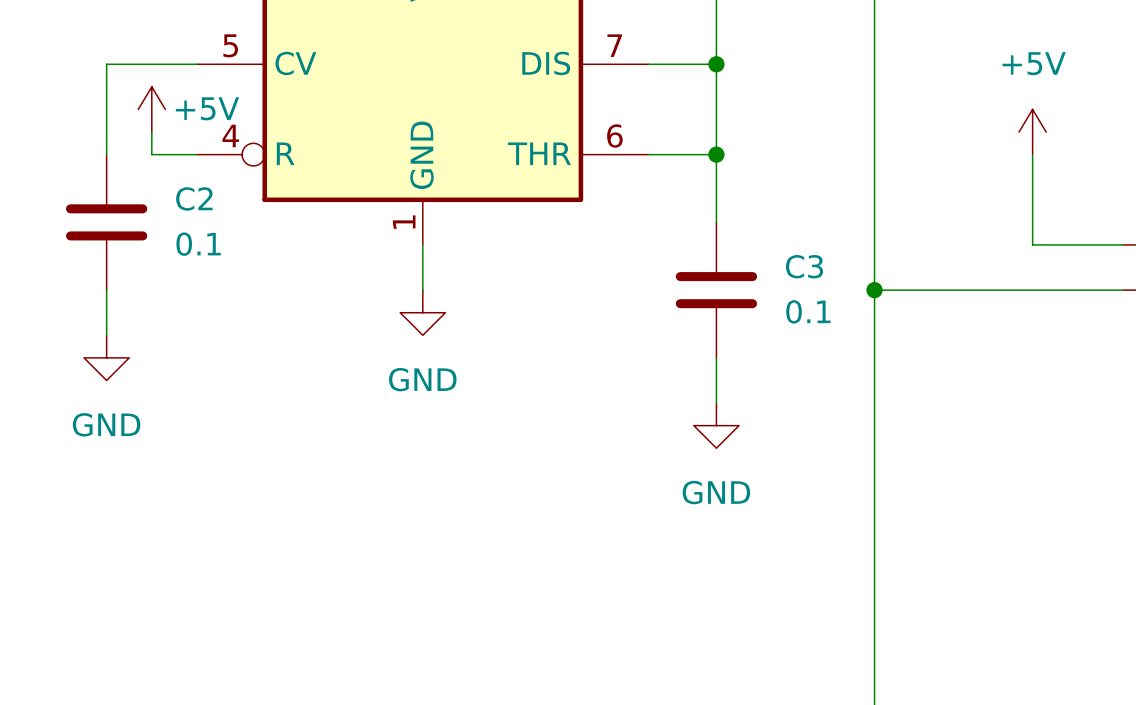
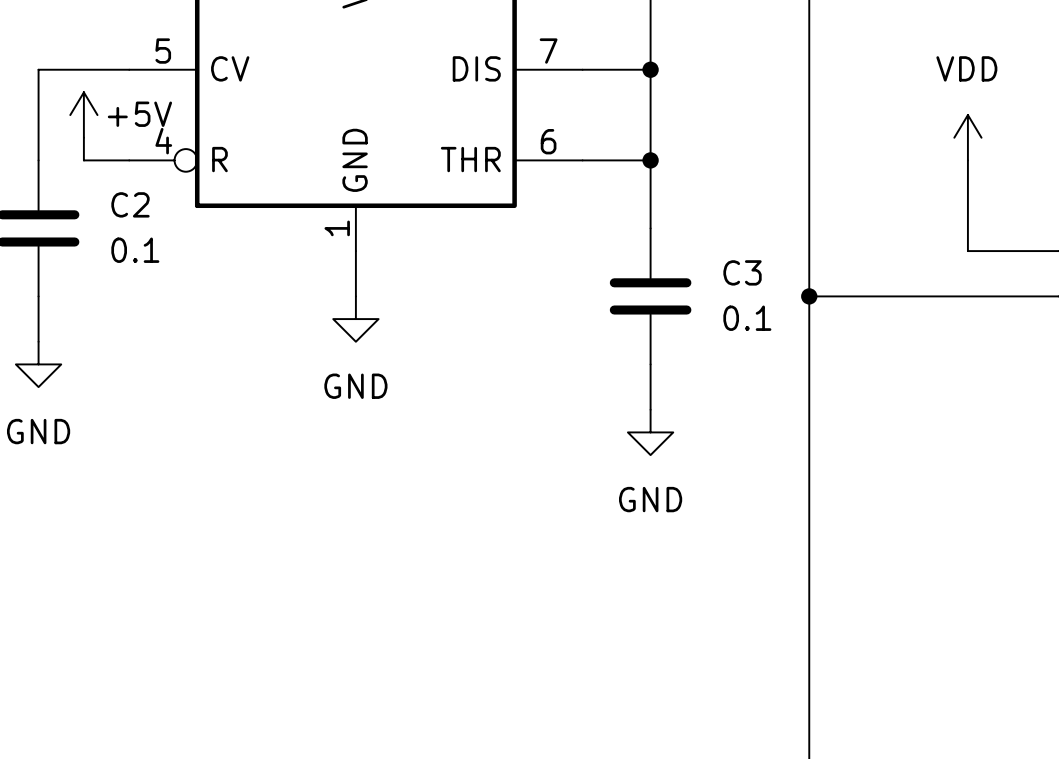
power symbol: +5V (1032, 132) -> VDD (967, 137)

